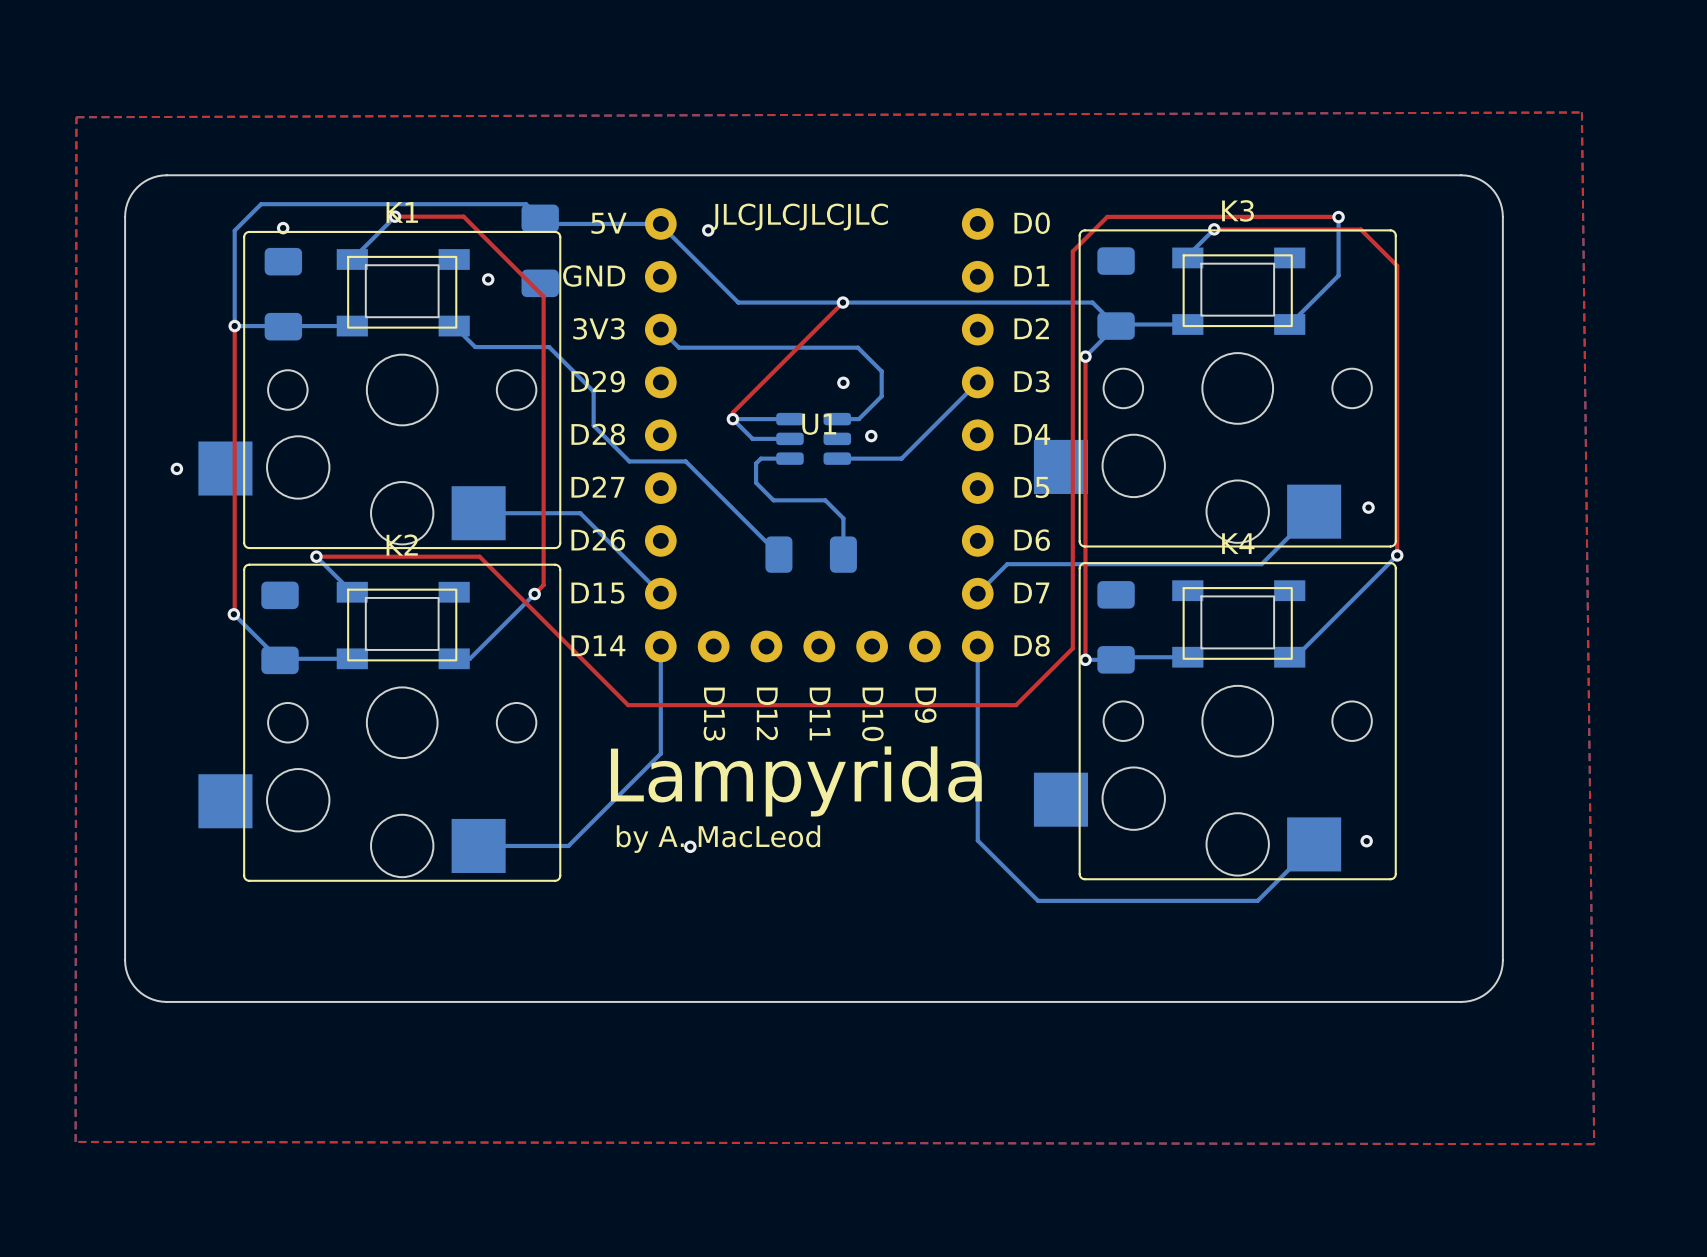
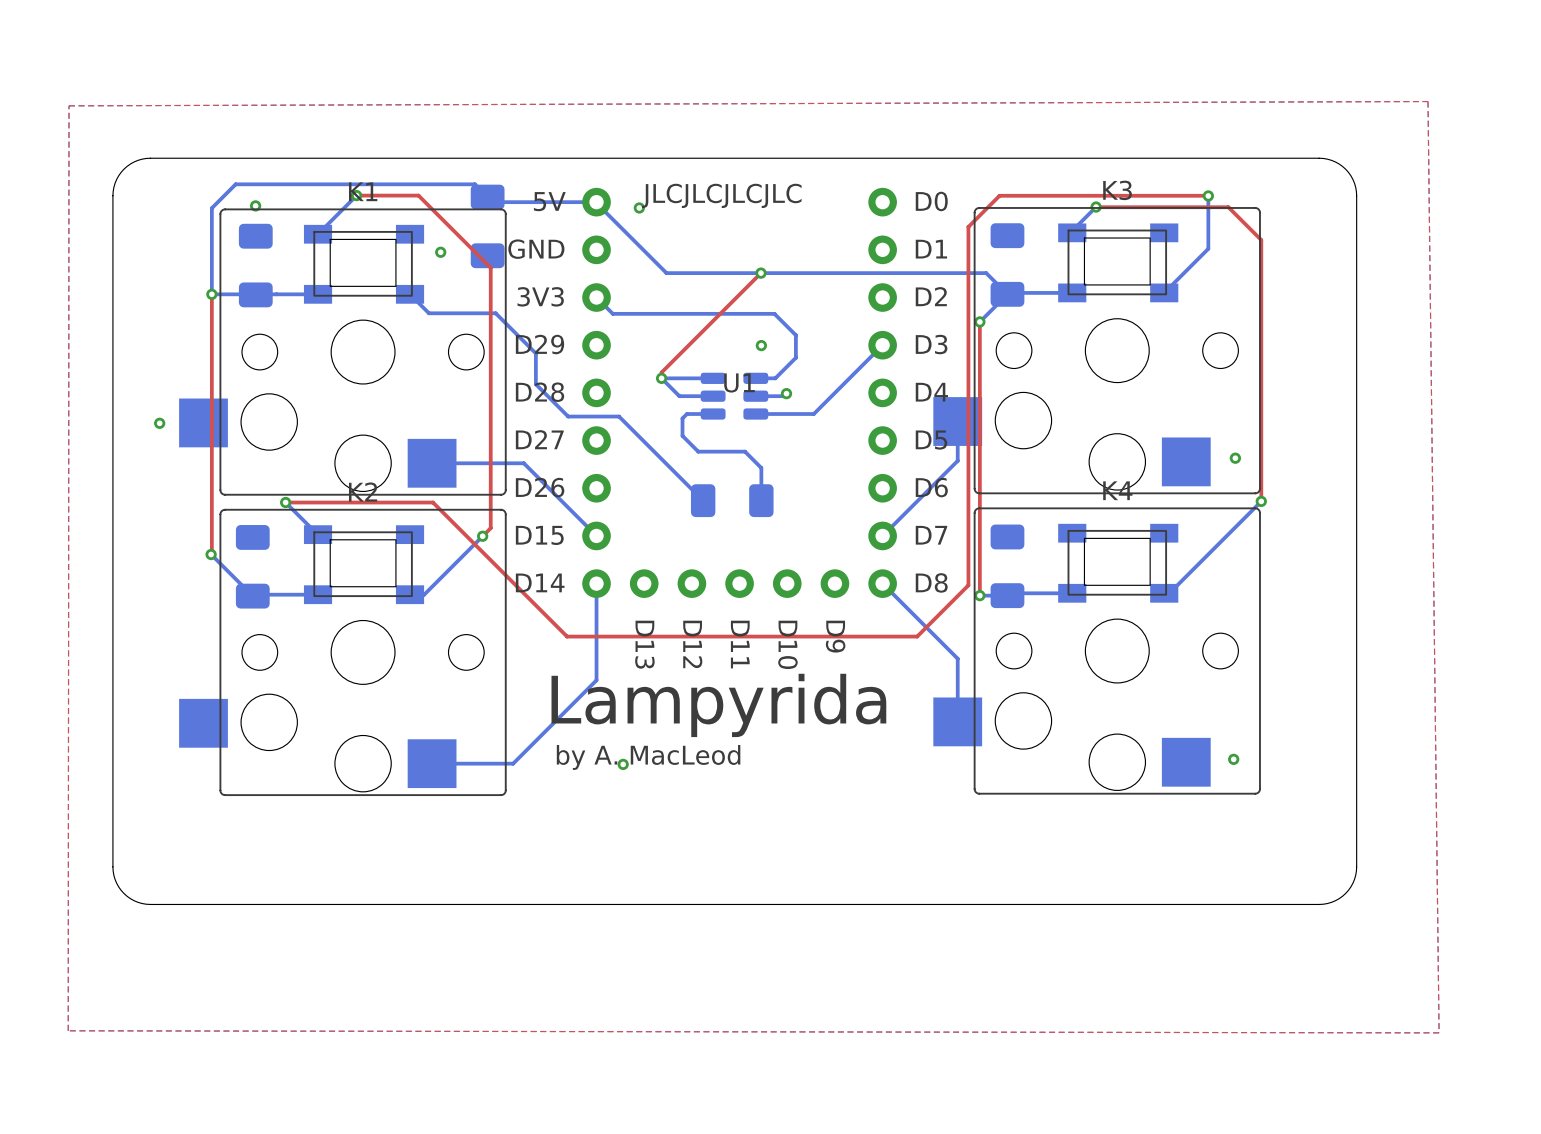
bottom track: none -> (786, 393) (783, 396) (755, 396)
bottom track: (1314, 511) (1261, 564) (1007, 564) -> (957, 421) (957, 460) (909, 509)
bottom track: (977, 646) (977, 840) (1038, 900) (1257, 900) (1314, 844) -> (882, 583) (957, 658) (957, 721)

